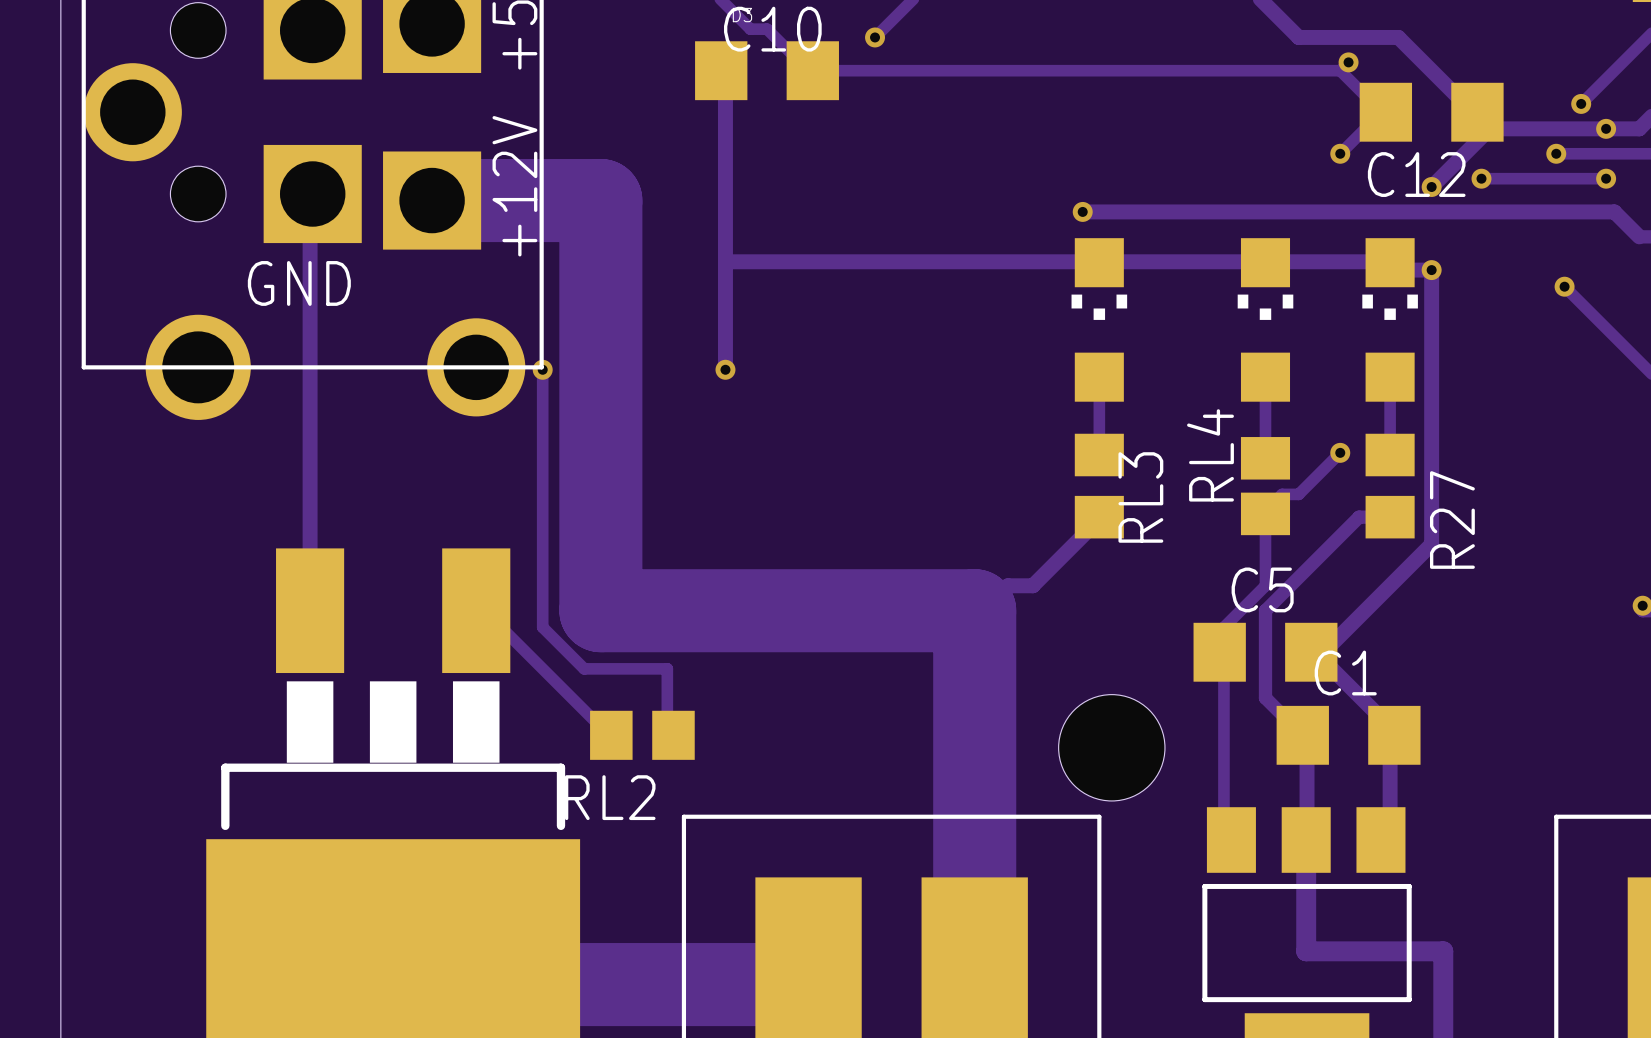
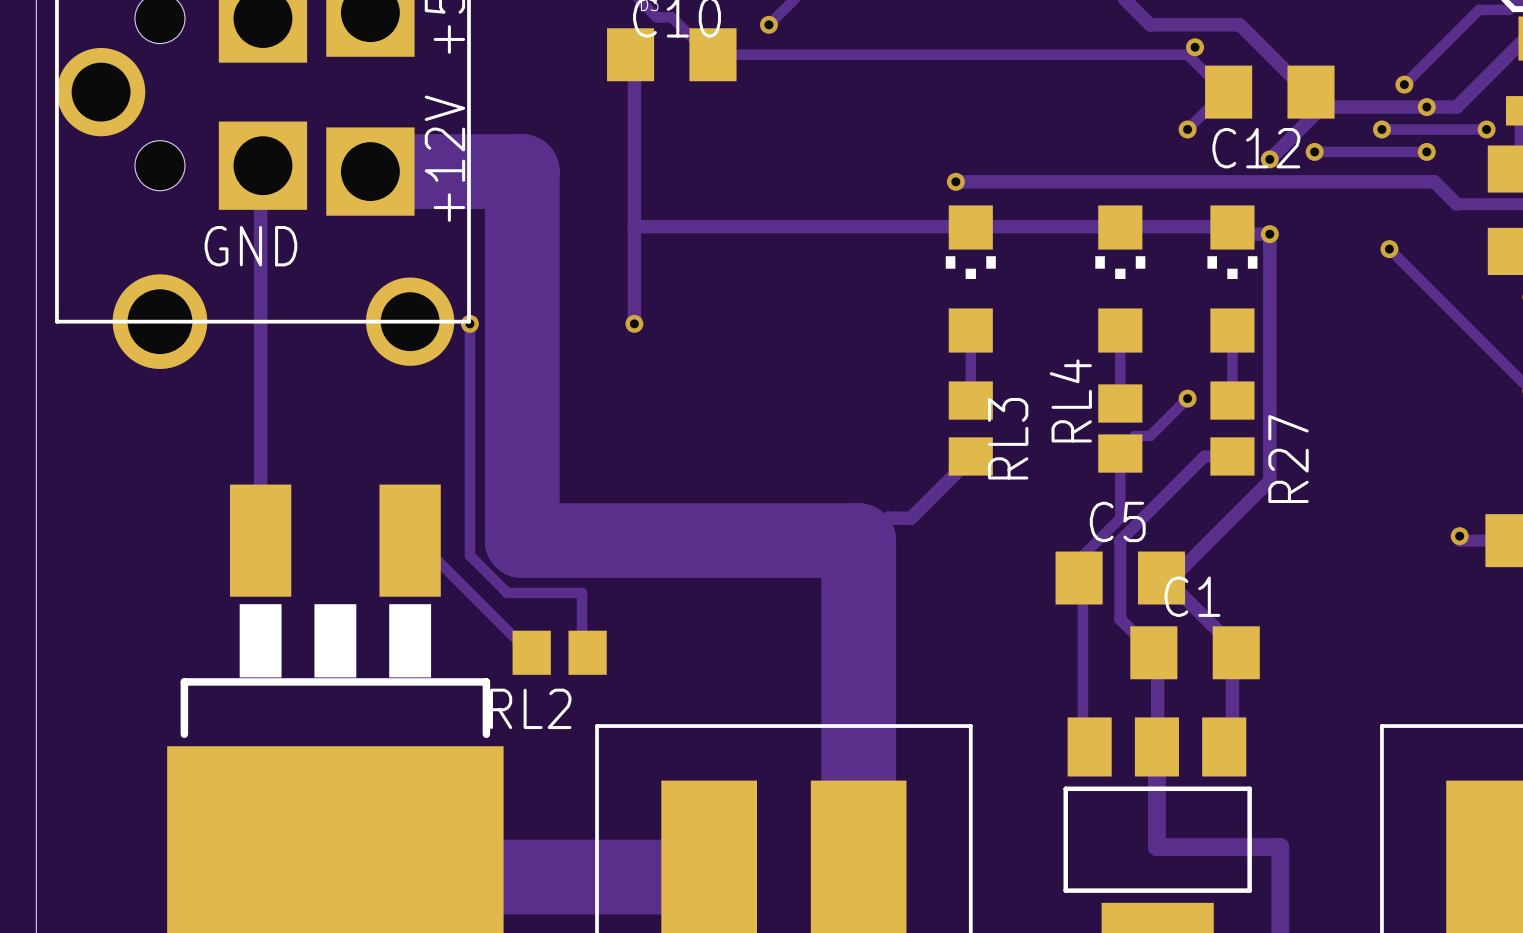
hole: (1111, 747) -> none

